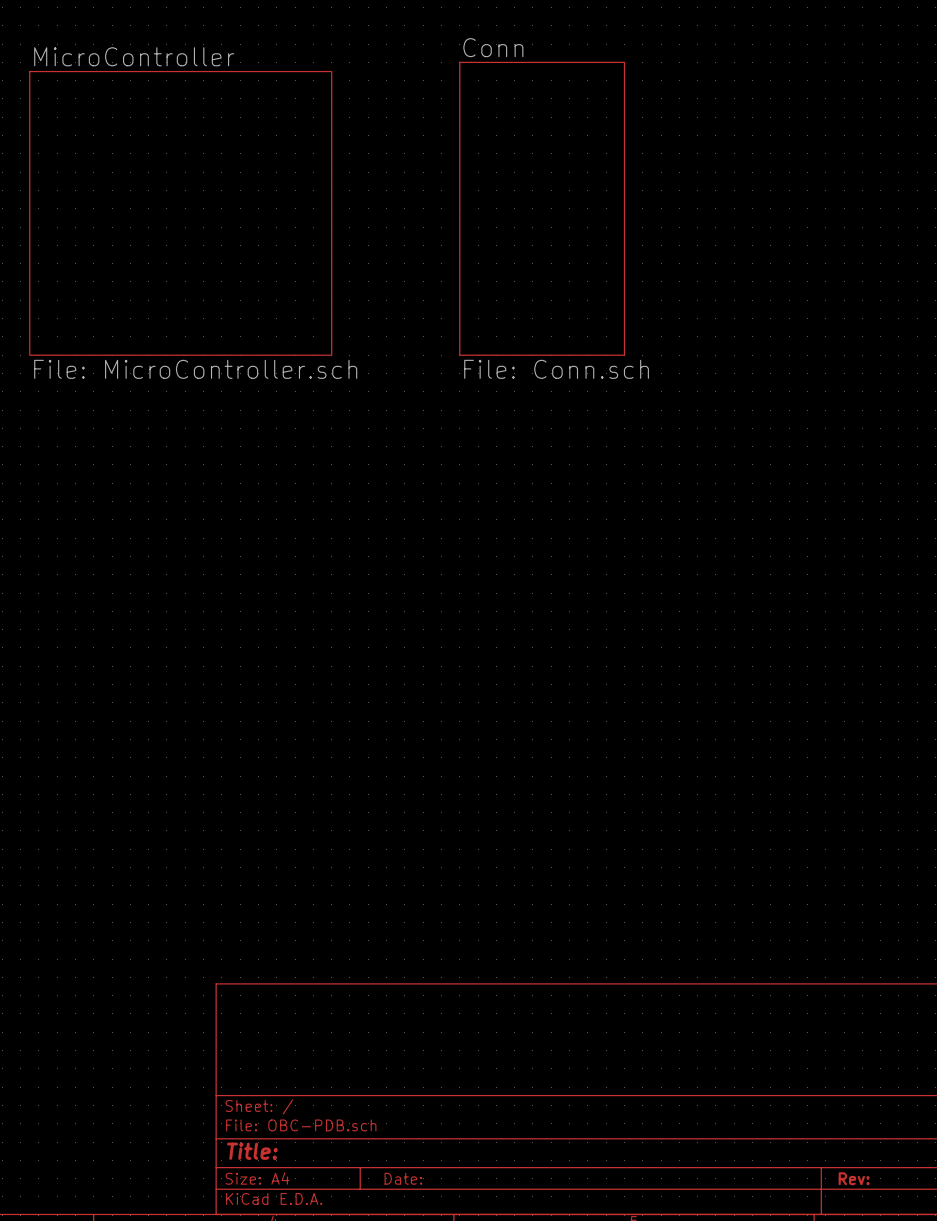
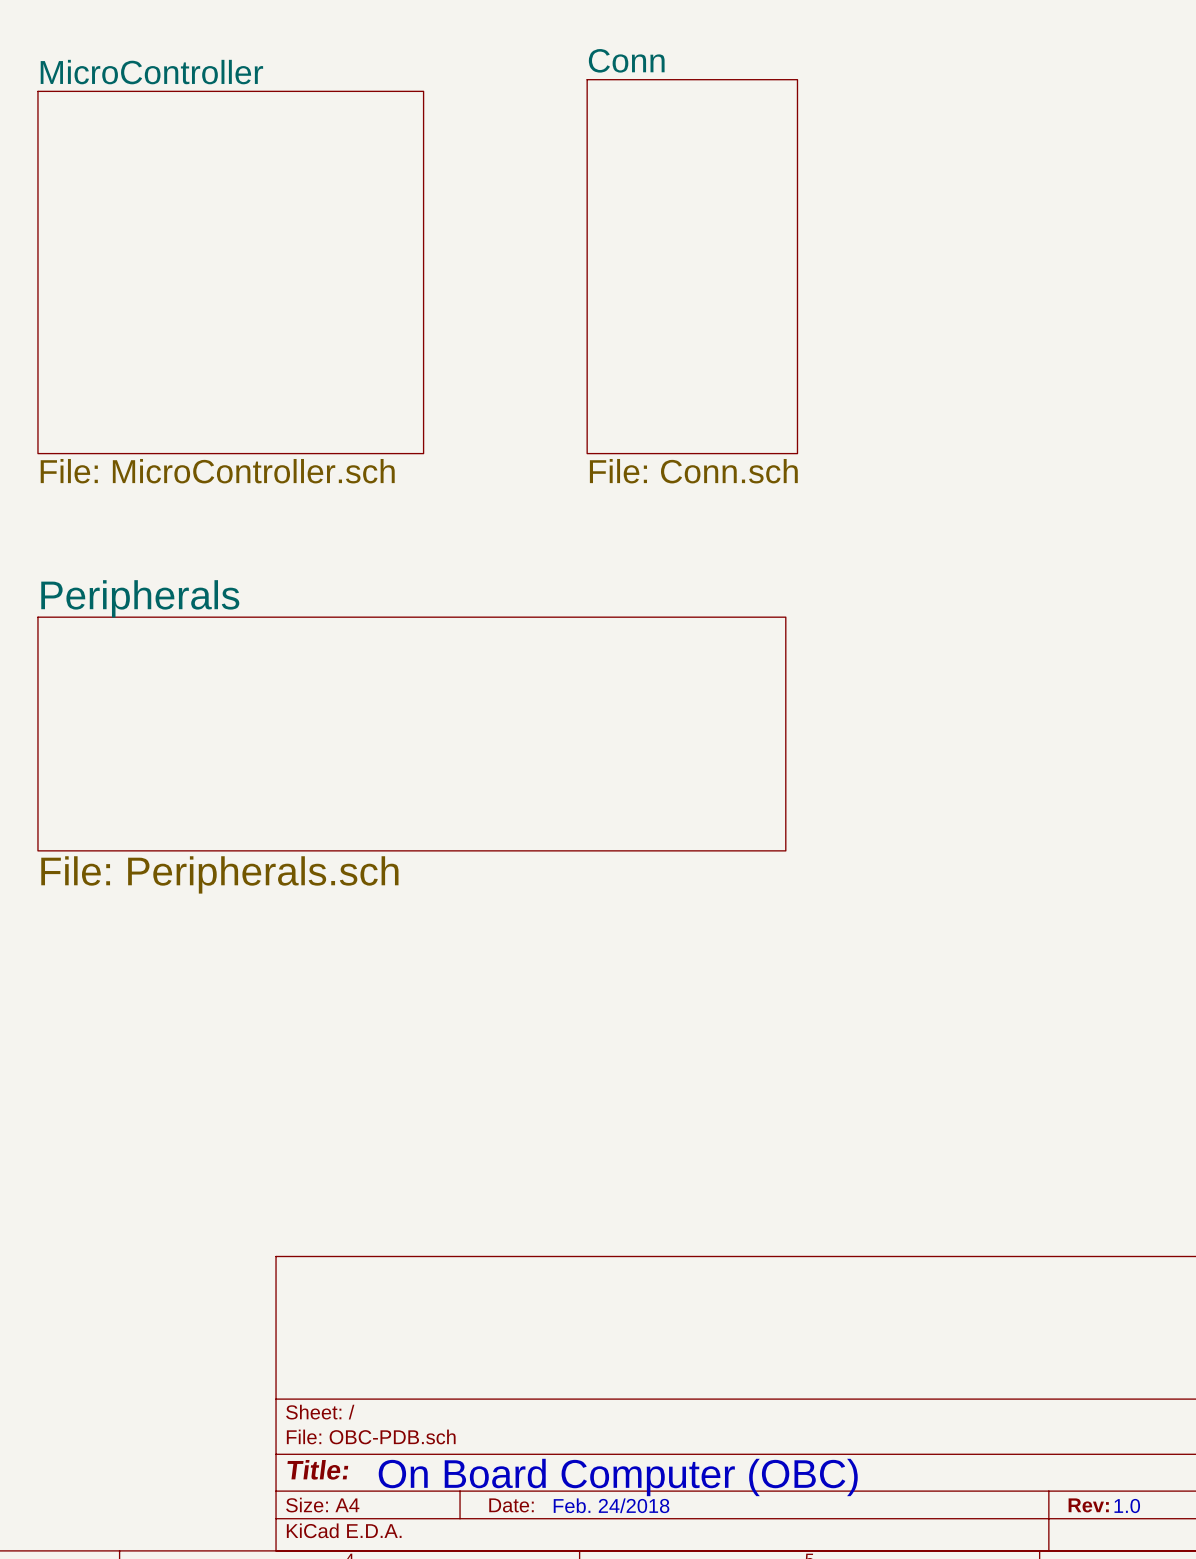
sheet Peripherals: none -> File: Peripherals.sch (411, 734)
text: none -> On Board Computer (OBC) (618, 1477)
text: none -> 1.0 (1127, 1506)
text: none -> Feb. 24/2018 (611, 1505)

